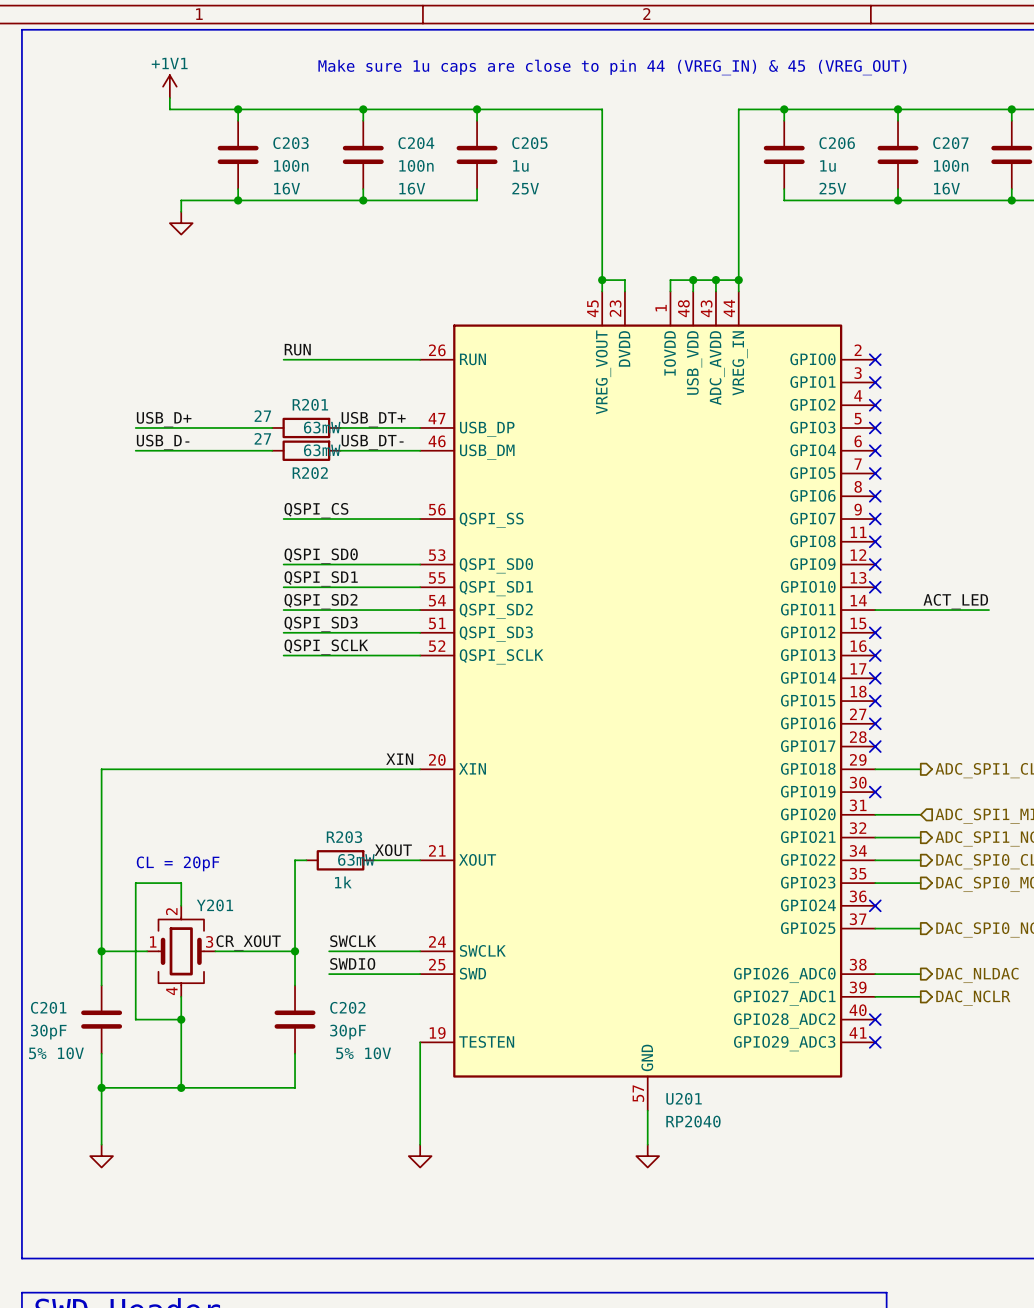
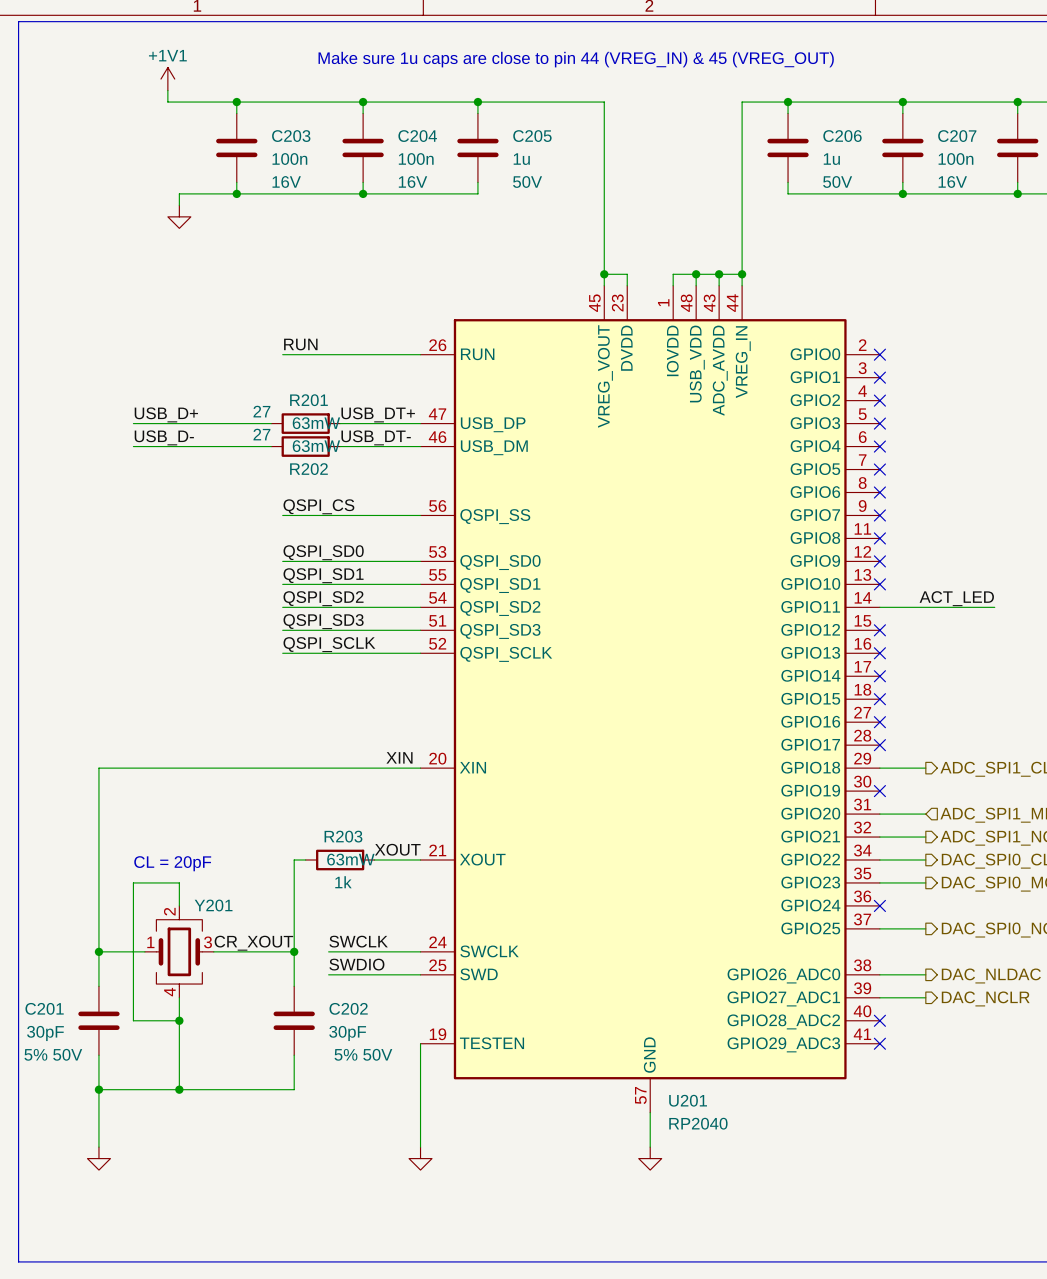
C205 text: 25V (525, 188) -> 50V (527, 181)
C206 text: 25V (832, 188) -> 50V (837, 181)
C201 text: 5% 10V (56, 1053) -> 5% 50V (53, 1054)
C202 text: 5% 10V (363, 1053) -> 5% 50V (363, 1054)

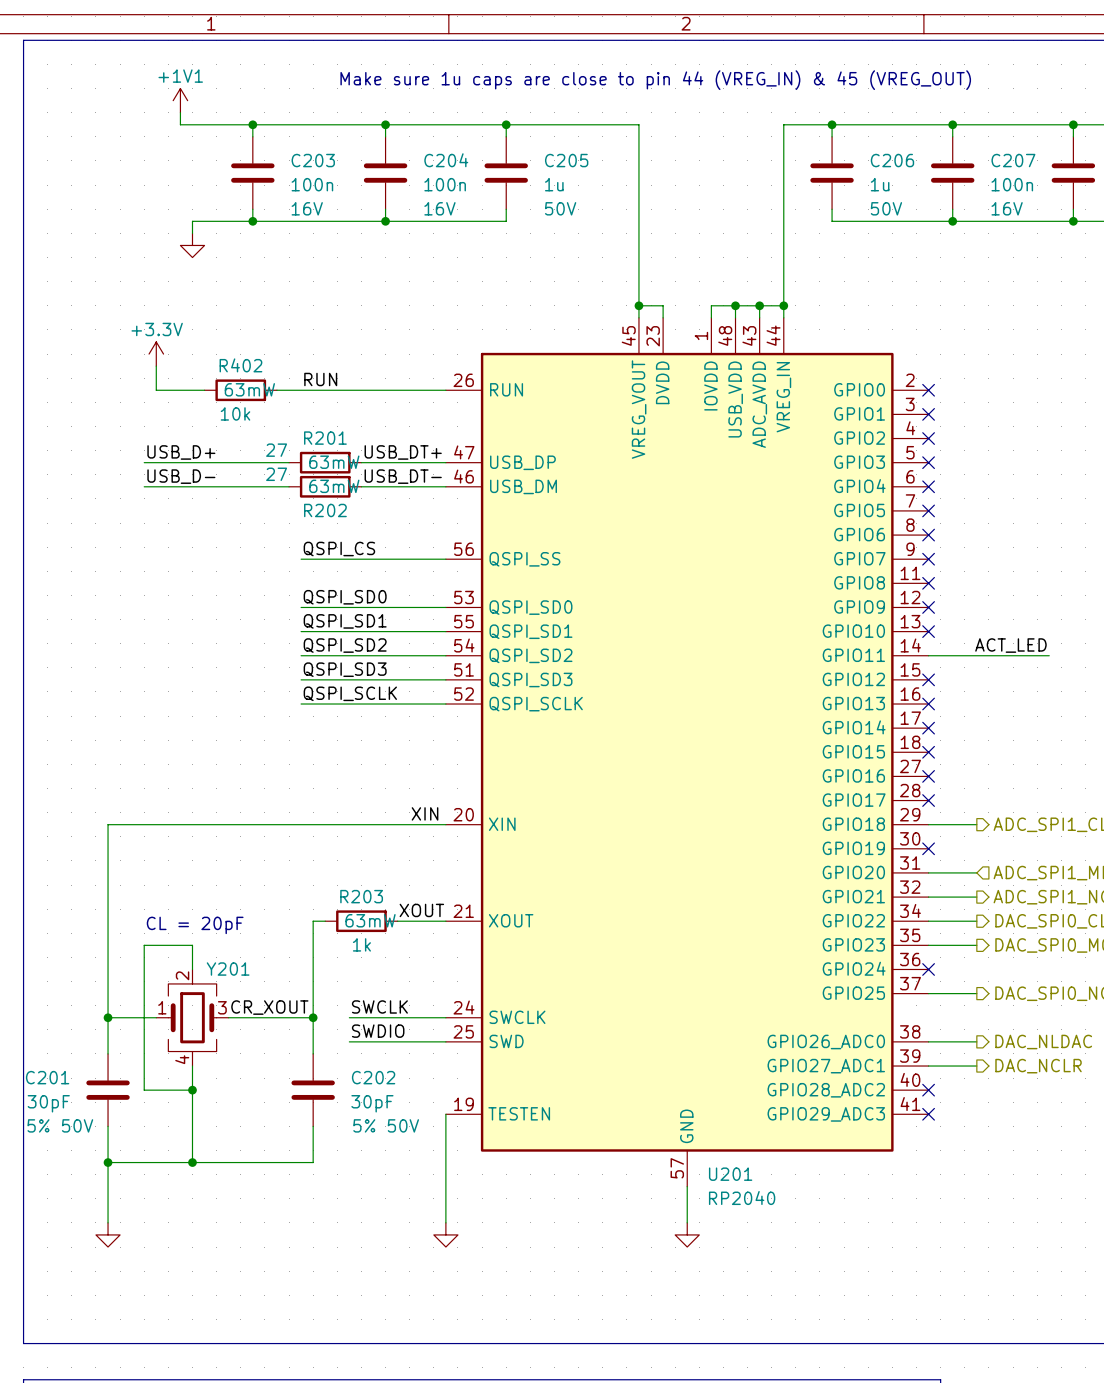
power symbol: none -> +3.3V (156, 354)
wire: none -> (156, 366) (156, 390) (204, 390)
R402: none -> 10k (240, 390)
wire: none -> (276, 390) (301, 390)

